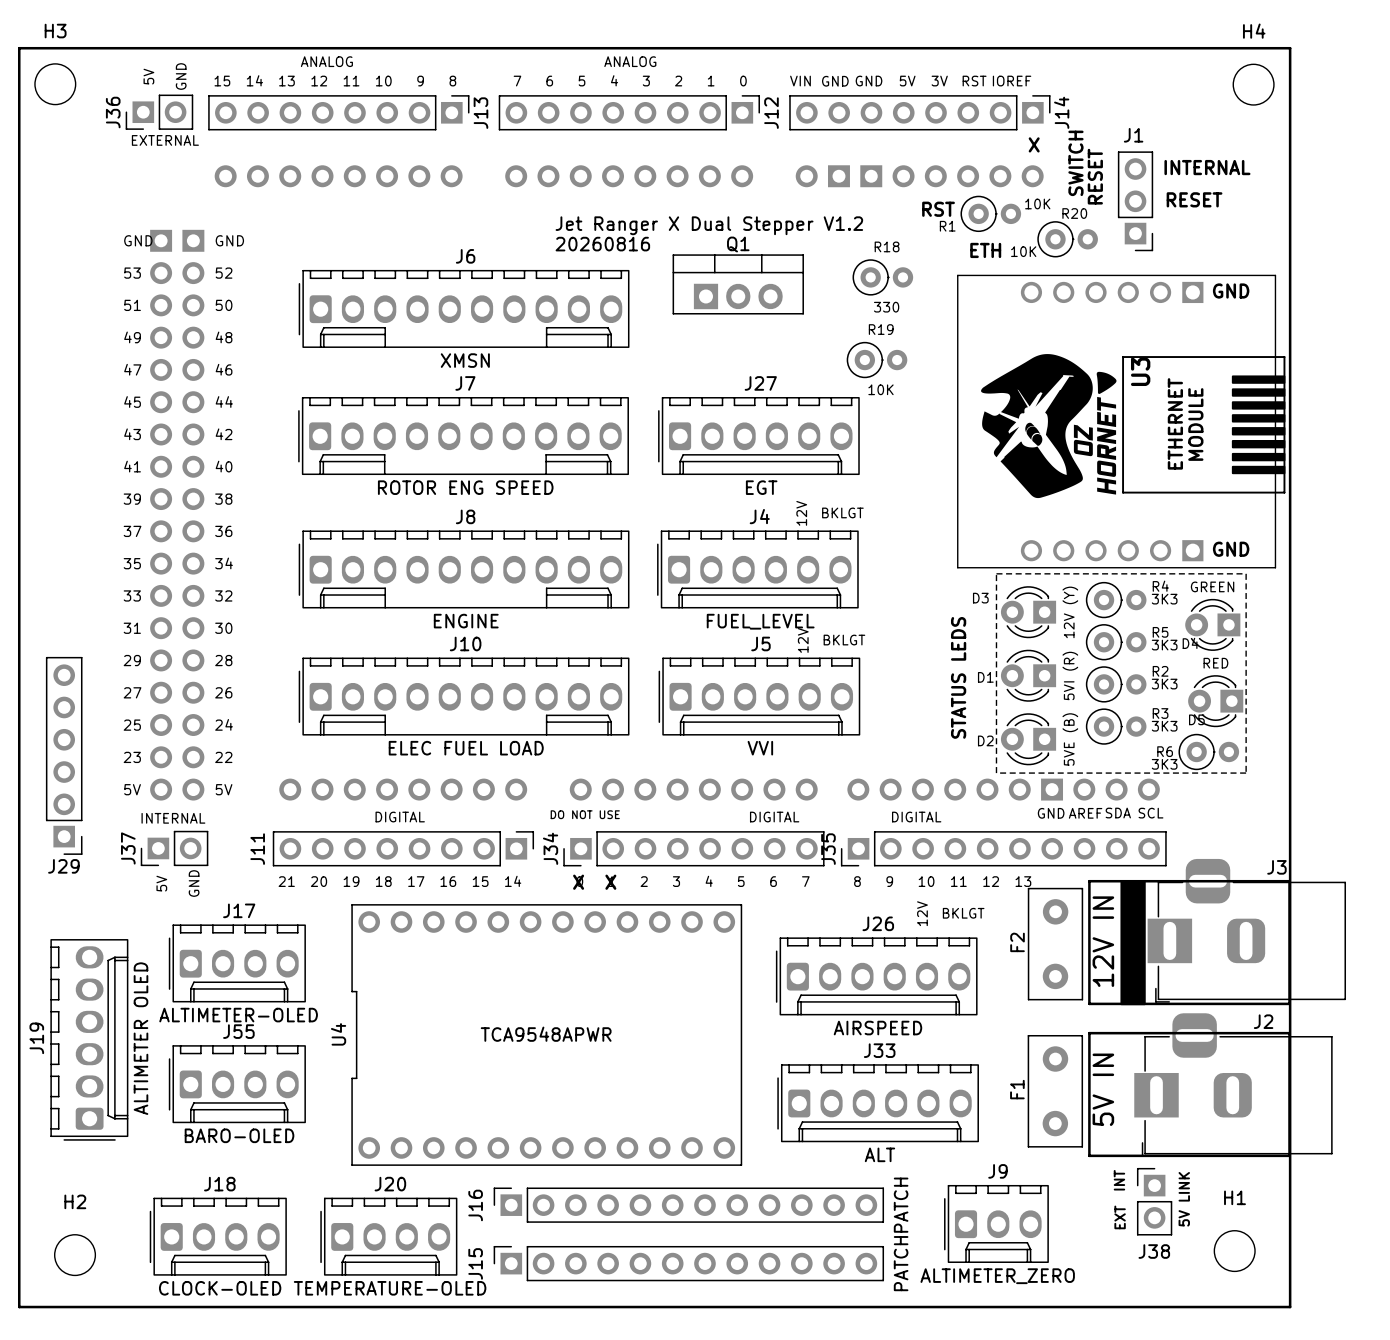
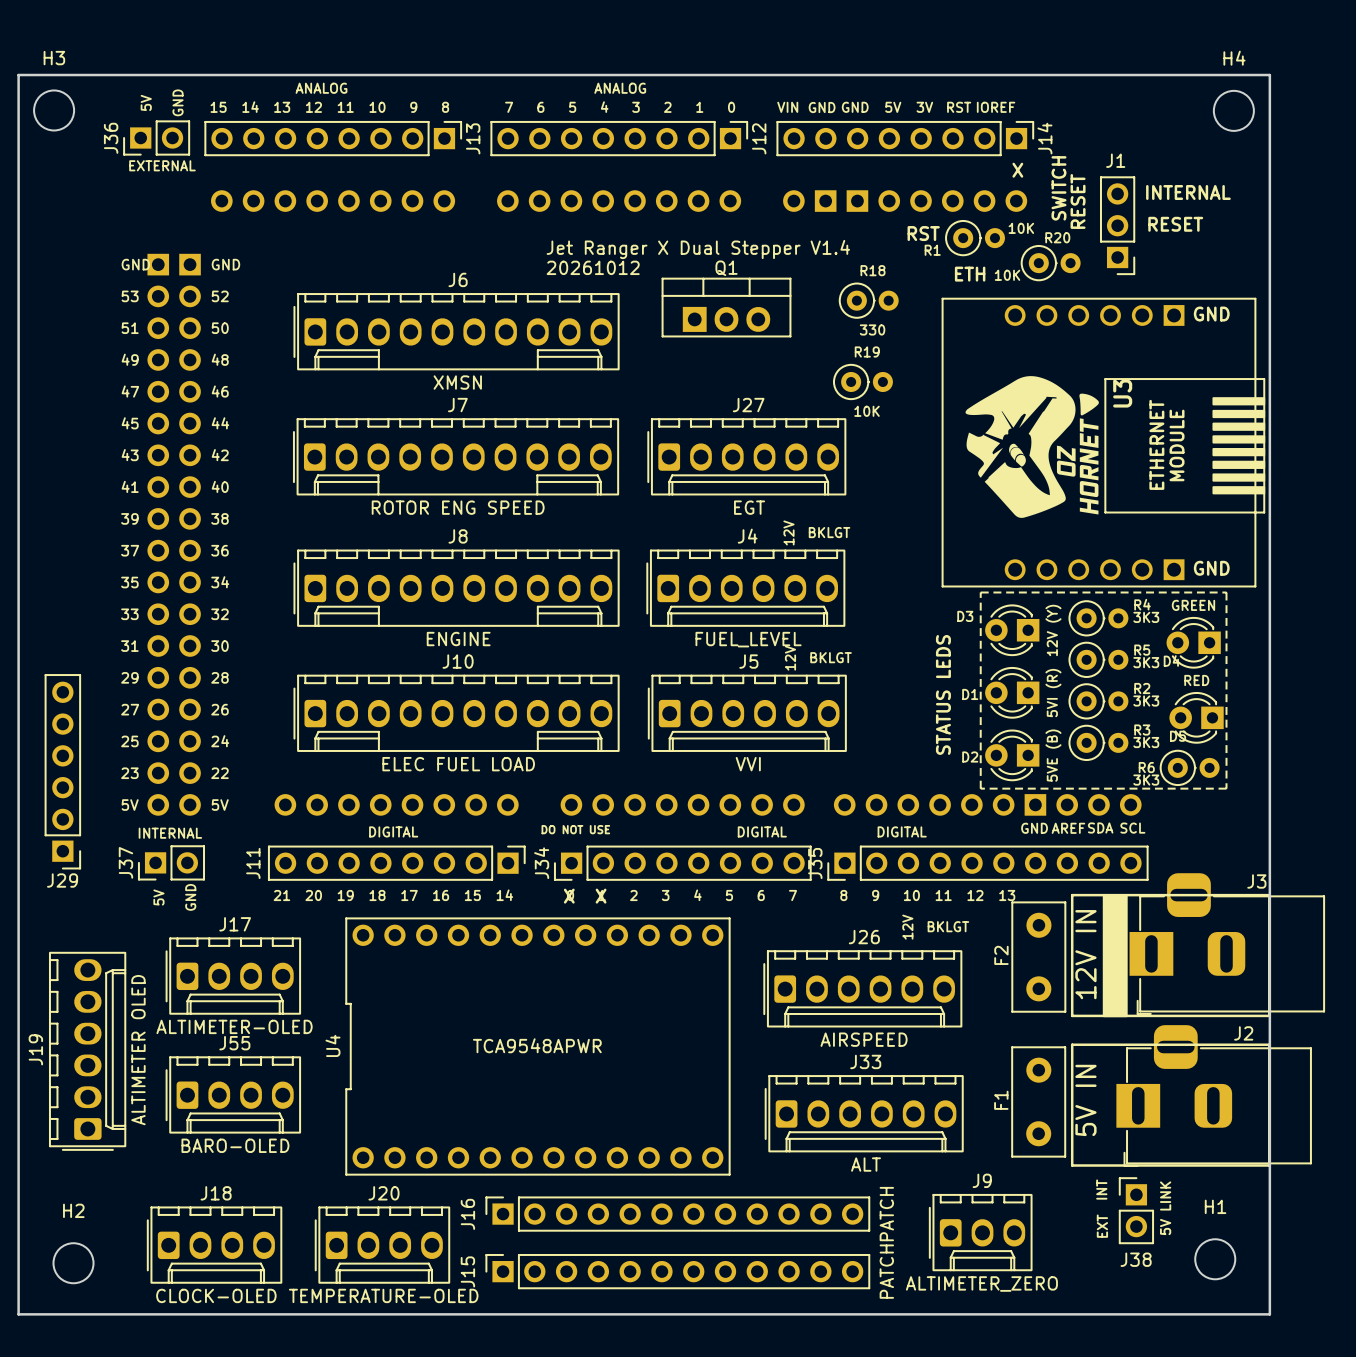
text: Jet Ranger X Dual Stepper V1.2 (709, 225) -> Jet Ranger X Dual Stepper V1.4 (698, 249)
text: 20260816 (602, 244) -> 20261012 (593, 267)

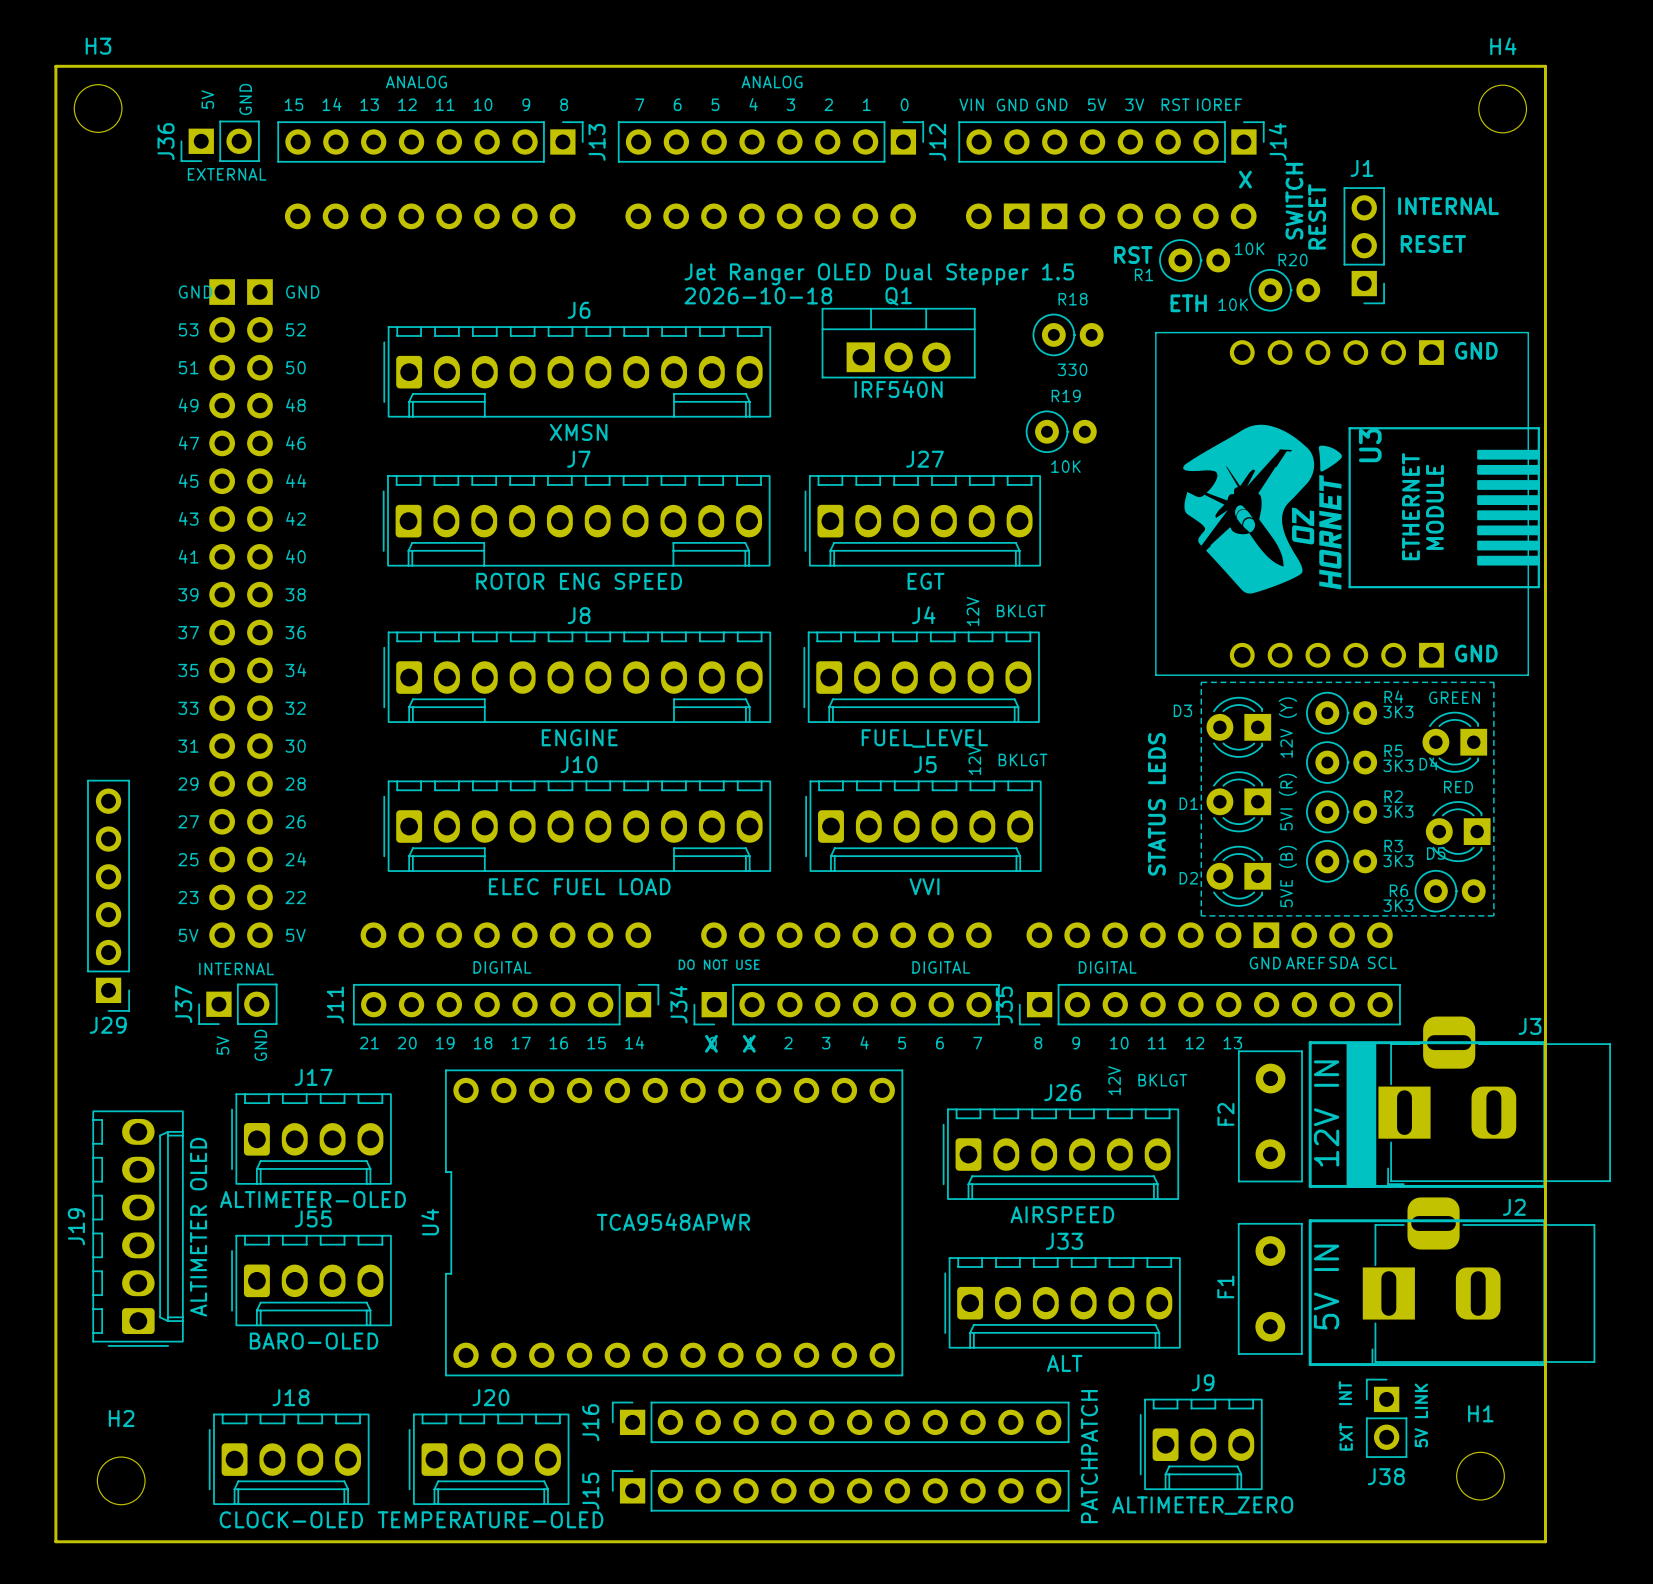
text: Jet Ranger X Dual Stepper V1.4 (698, 249) -> Jet Ranger OLED Dual Stepper 1.5 (879, 274)
text: 20261012 (593, 267) -> 2026-10-18 (758, 295)
Q1 value: none -> IRF540N (898, 389)

